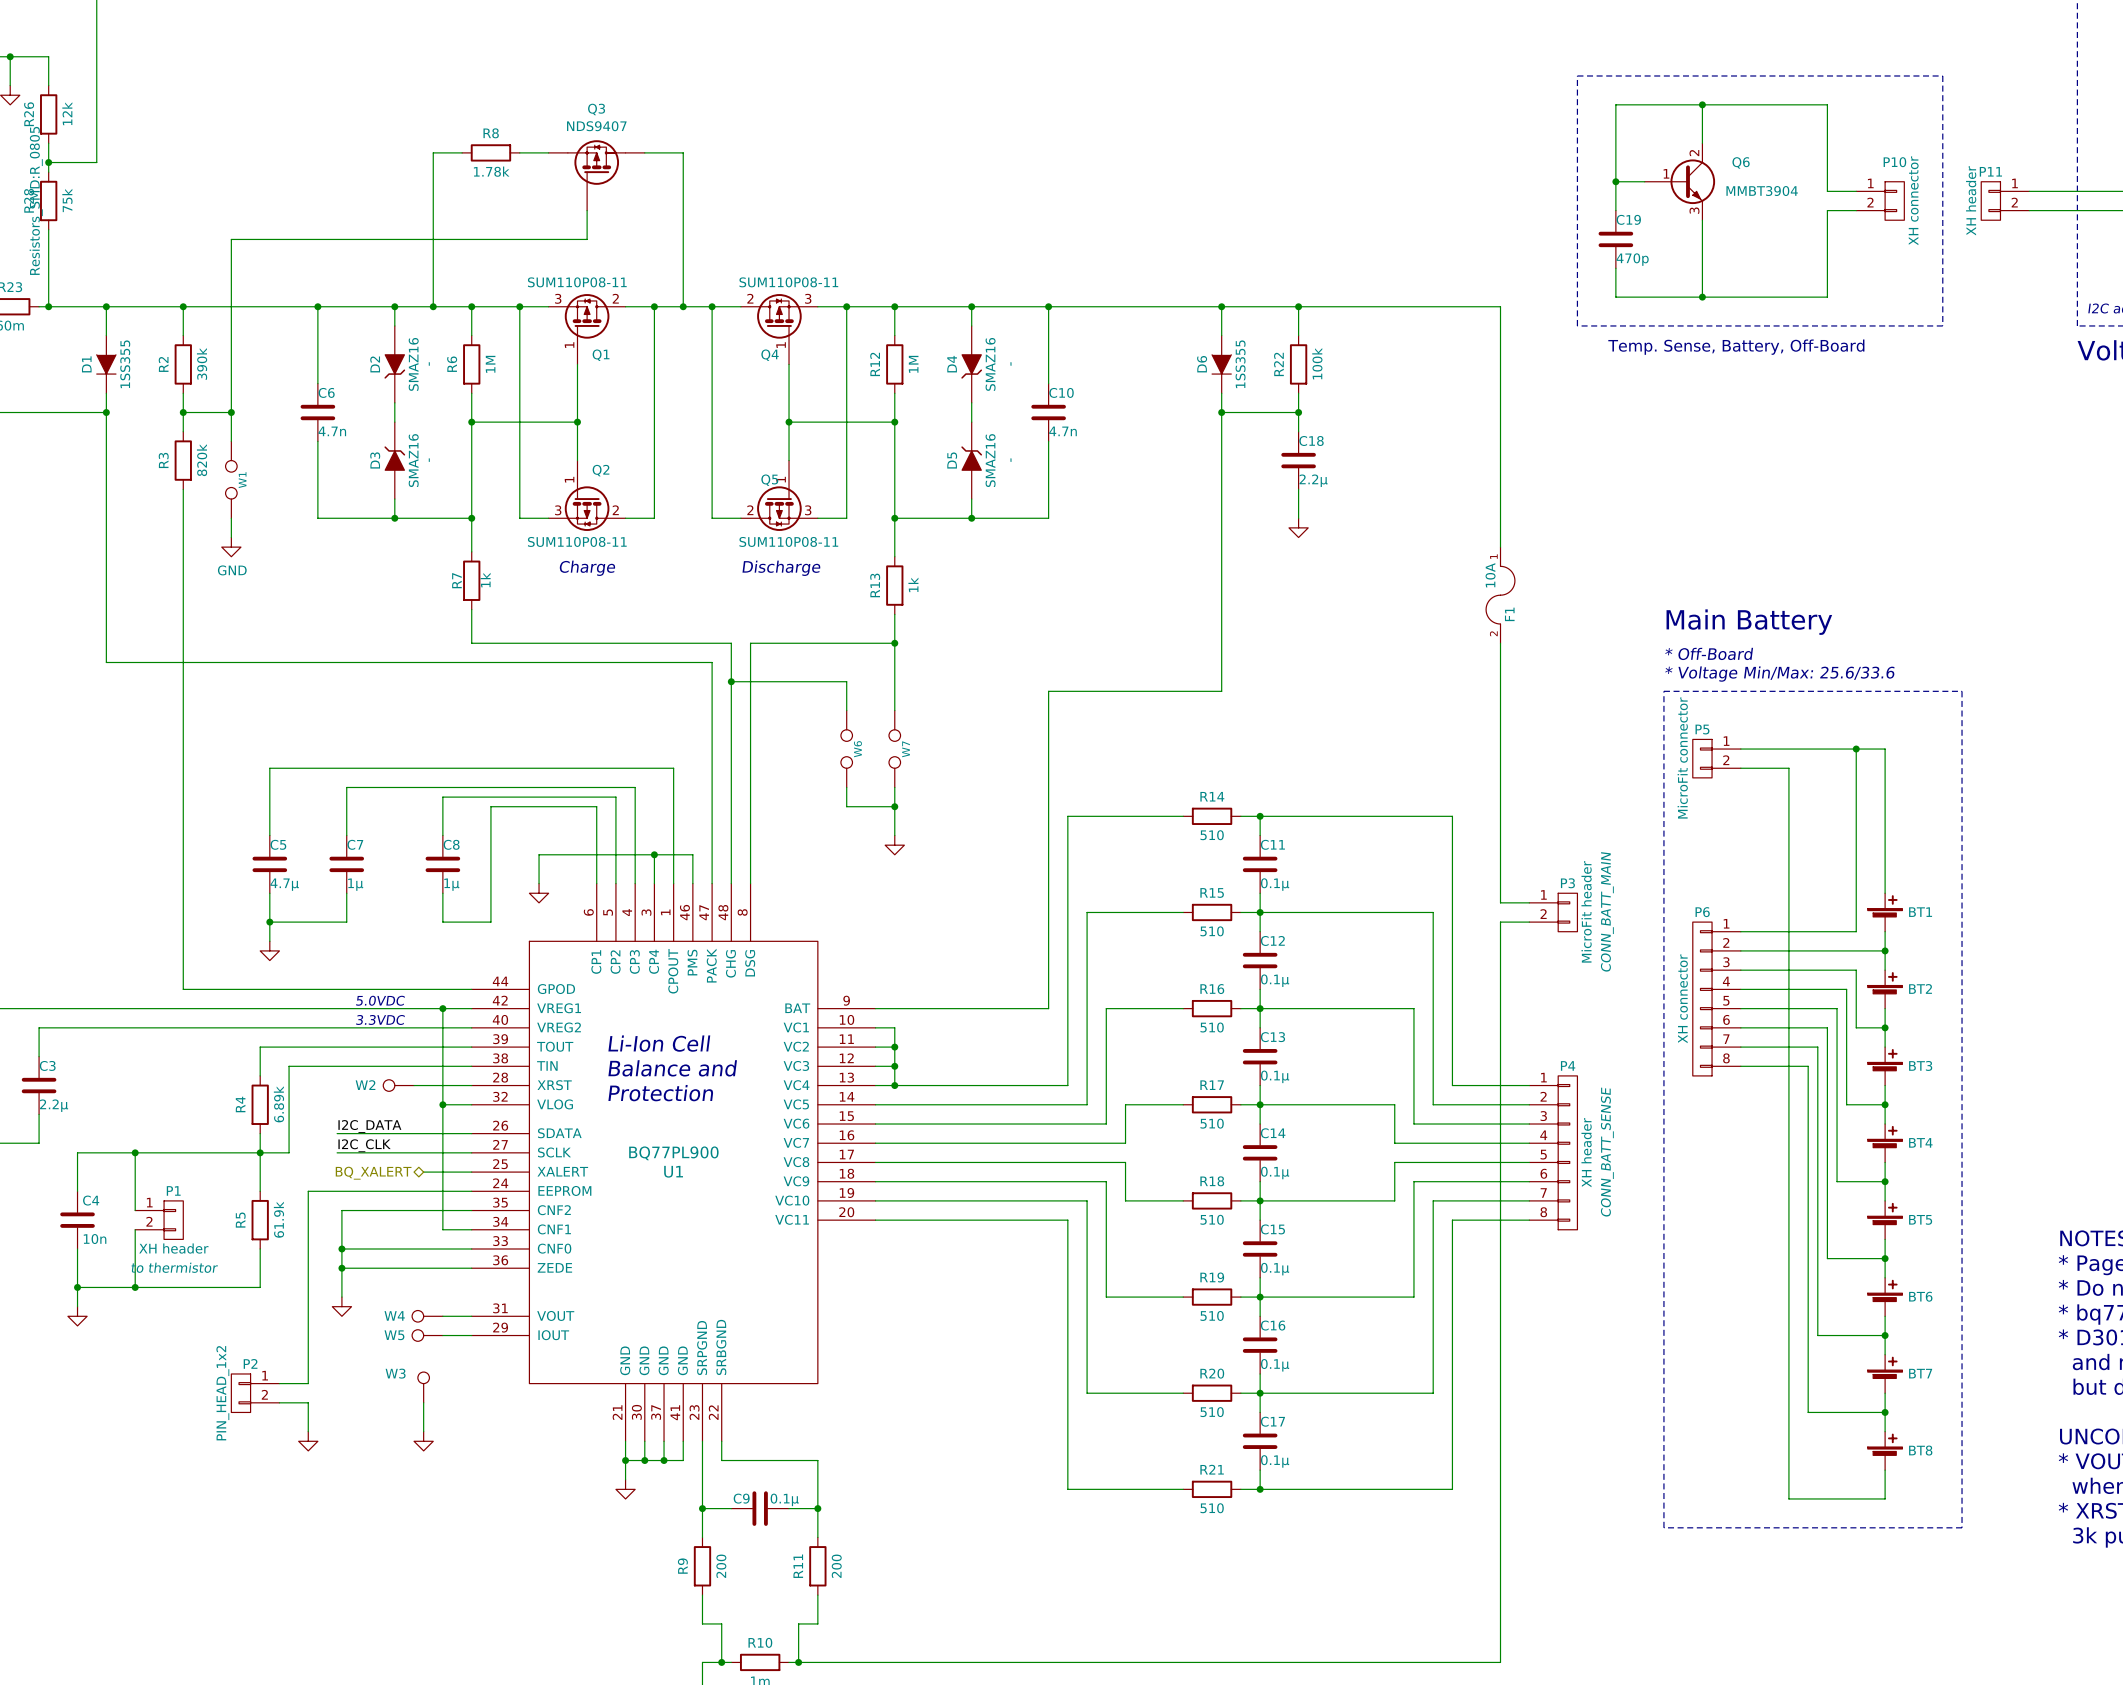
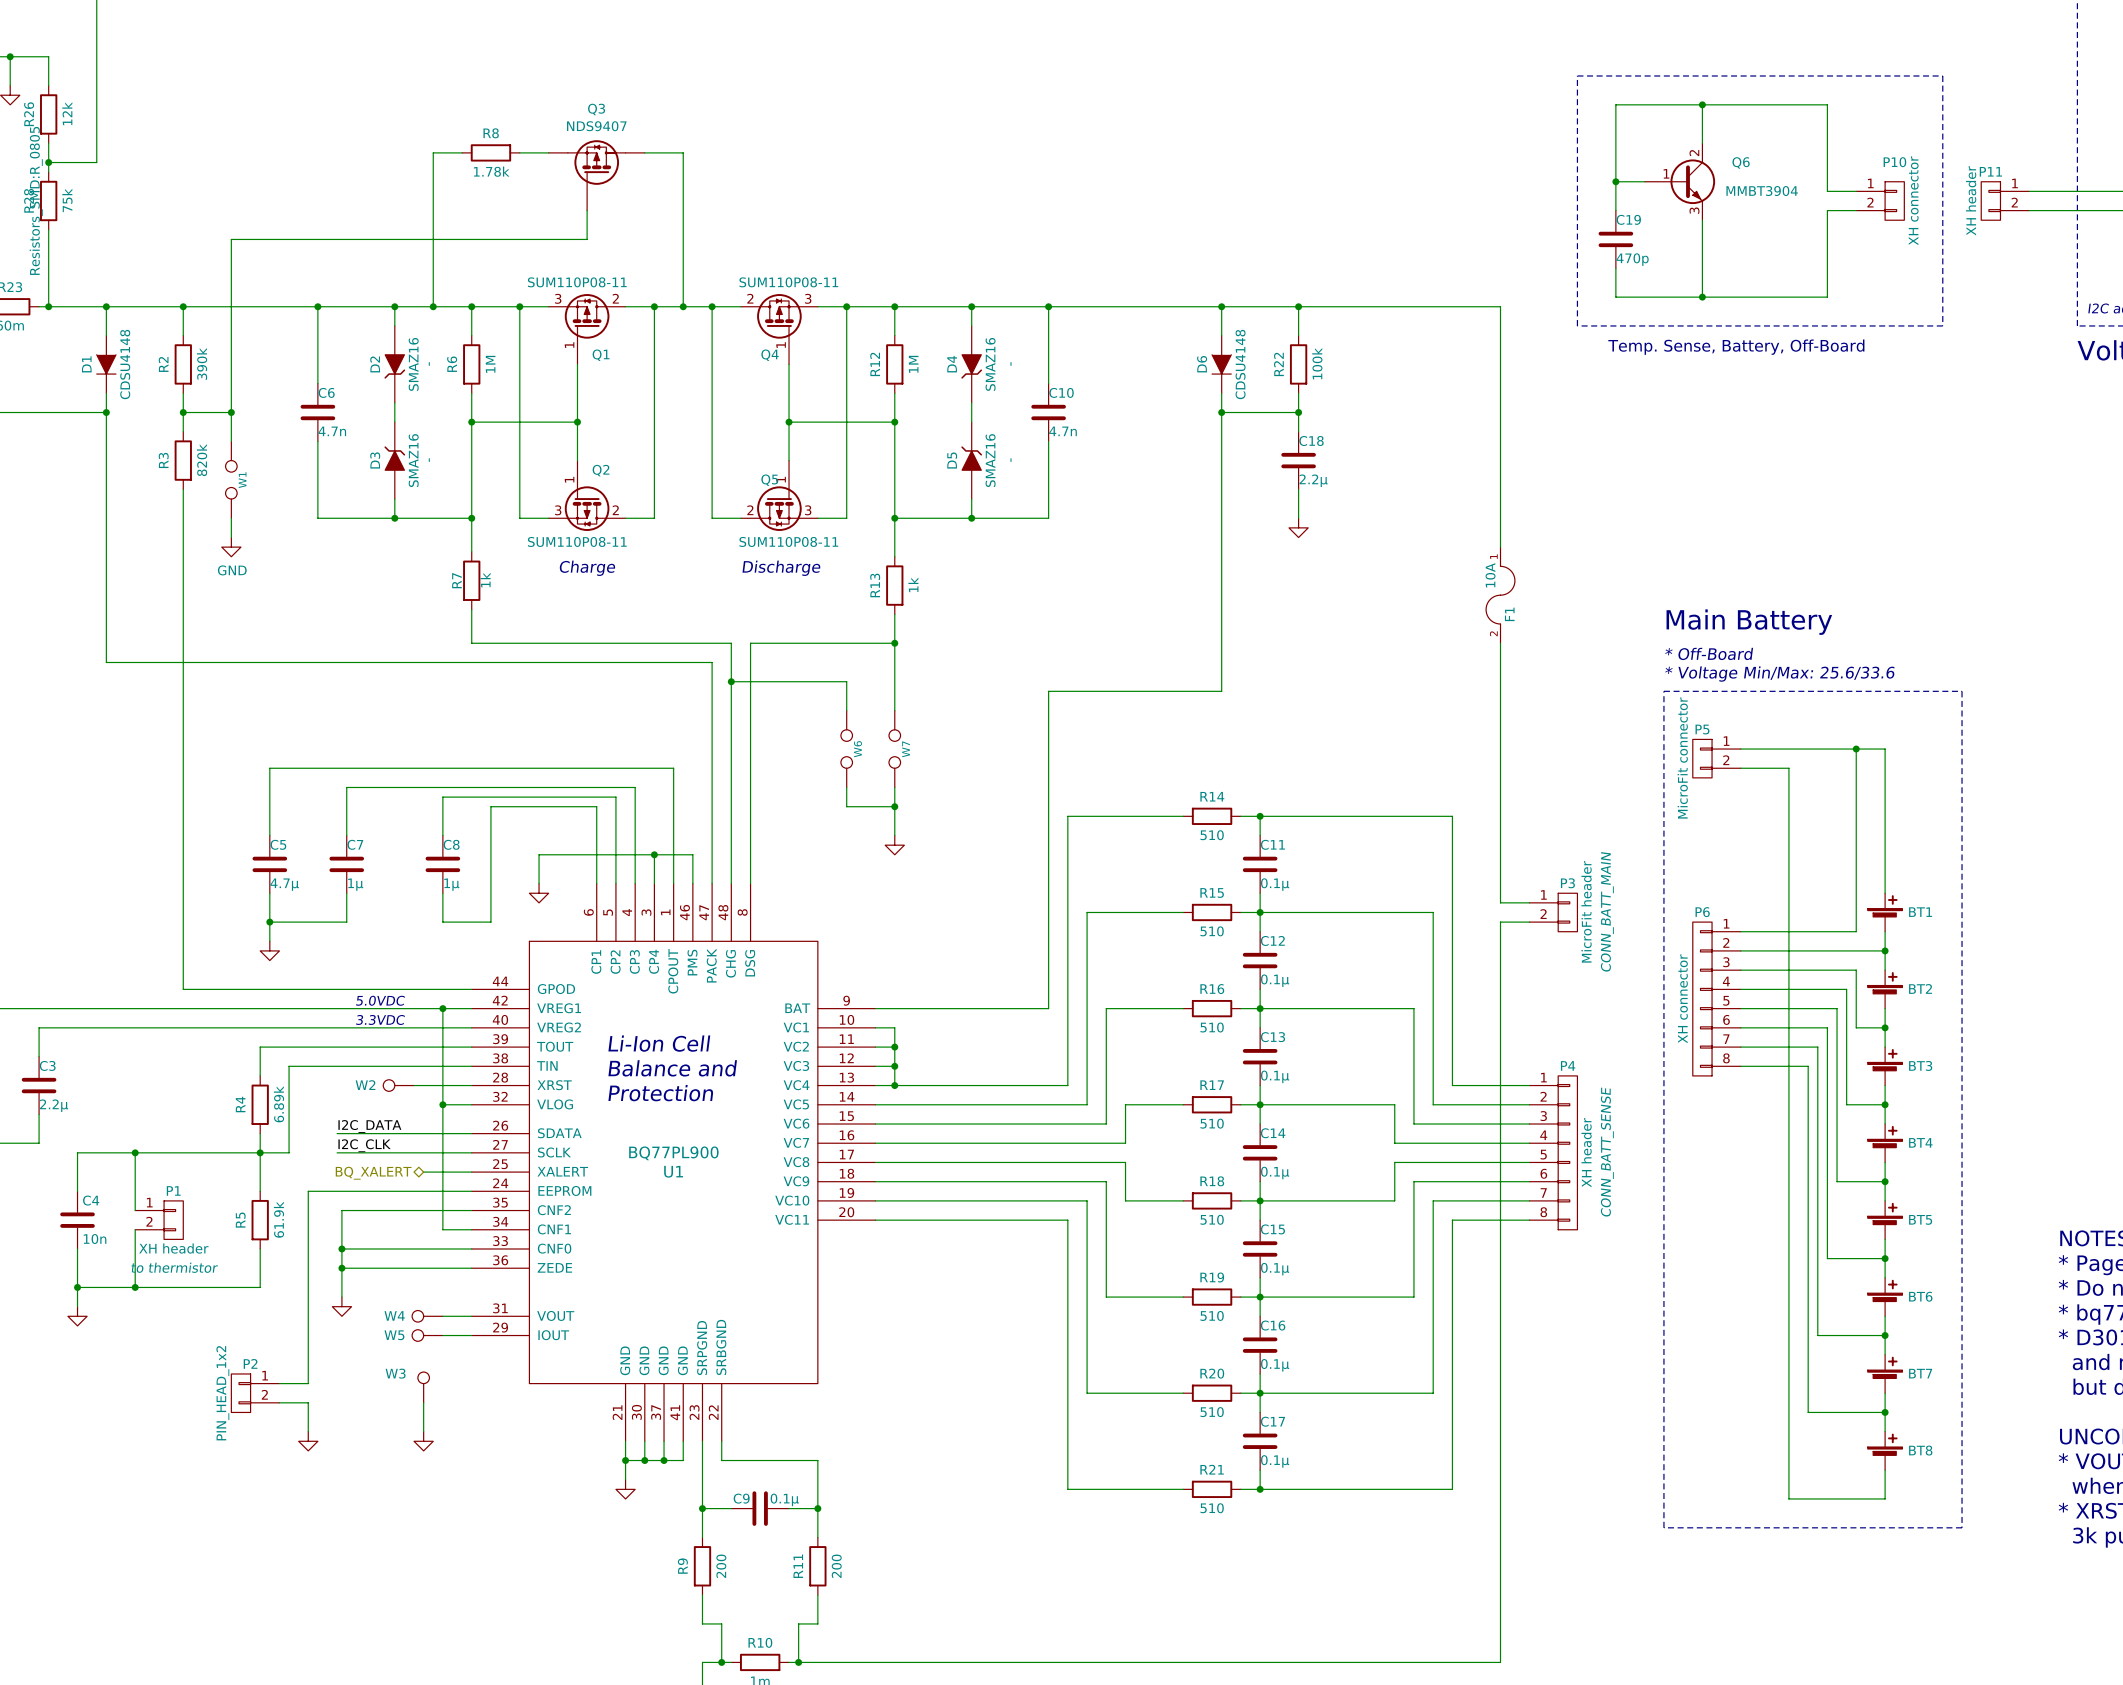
D1 value: 1SS355 (125, 364) -> CDSU4148 (125, 364)
D6 value: 1SS355 (1240, 364) -> CDSU4148 (1240, 364)

